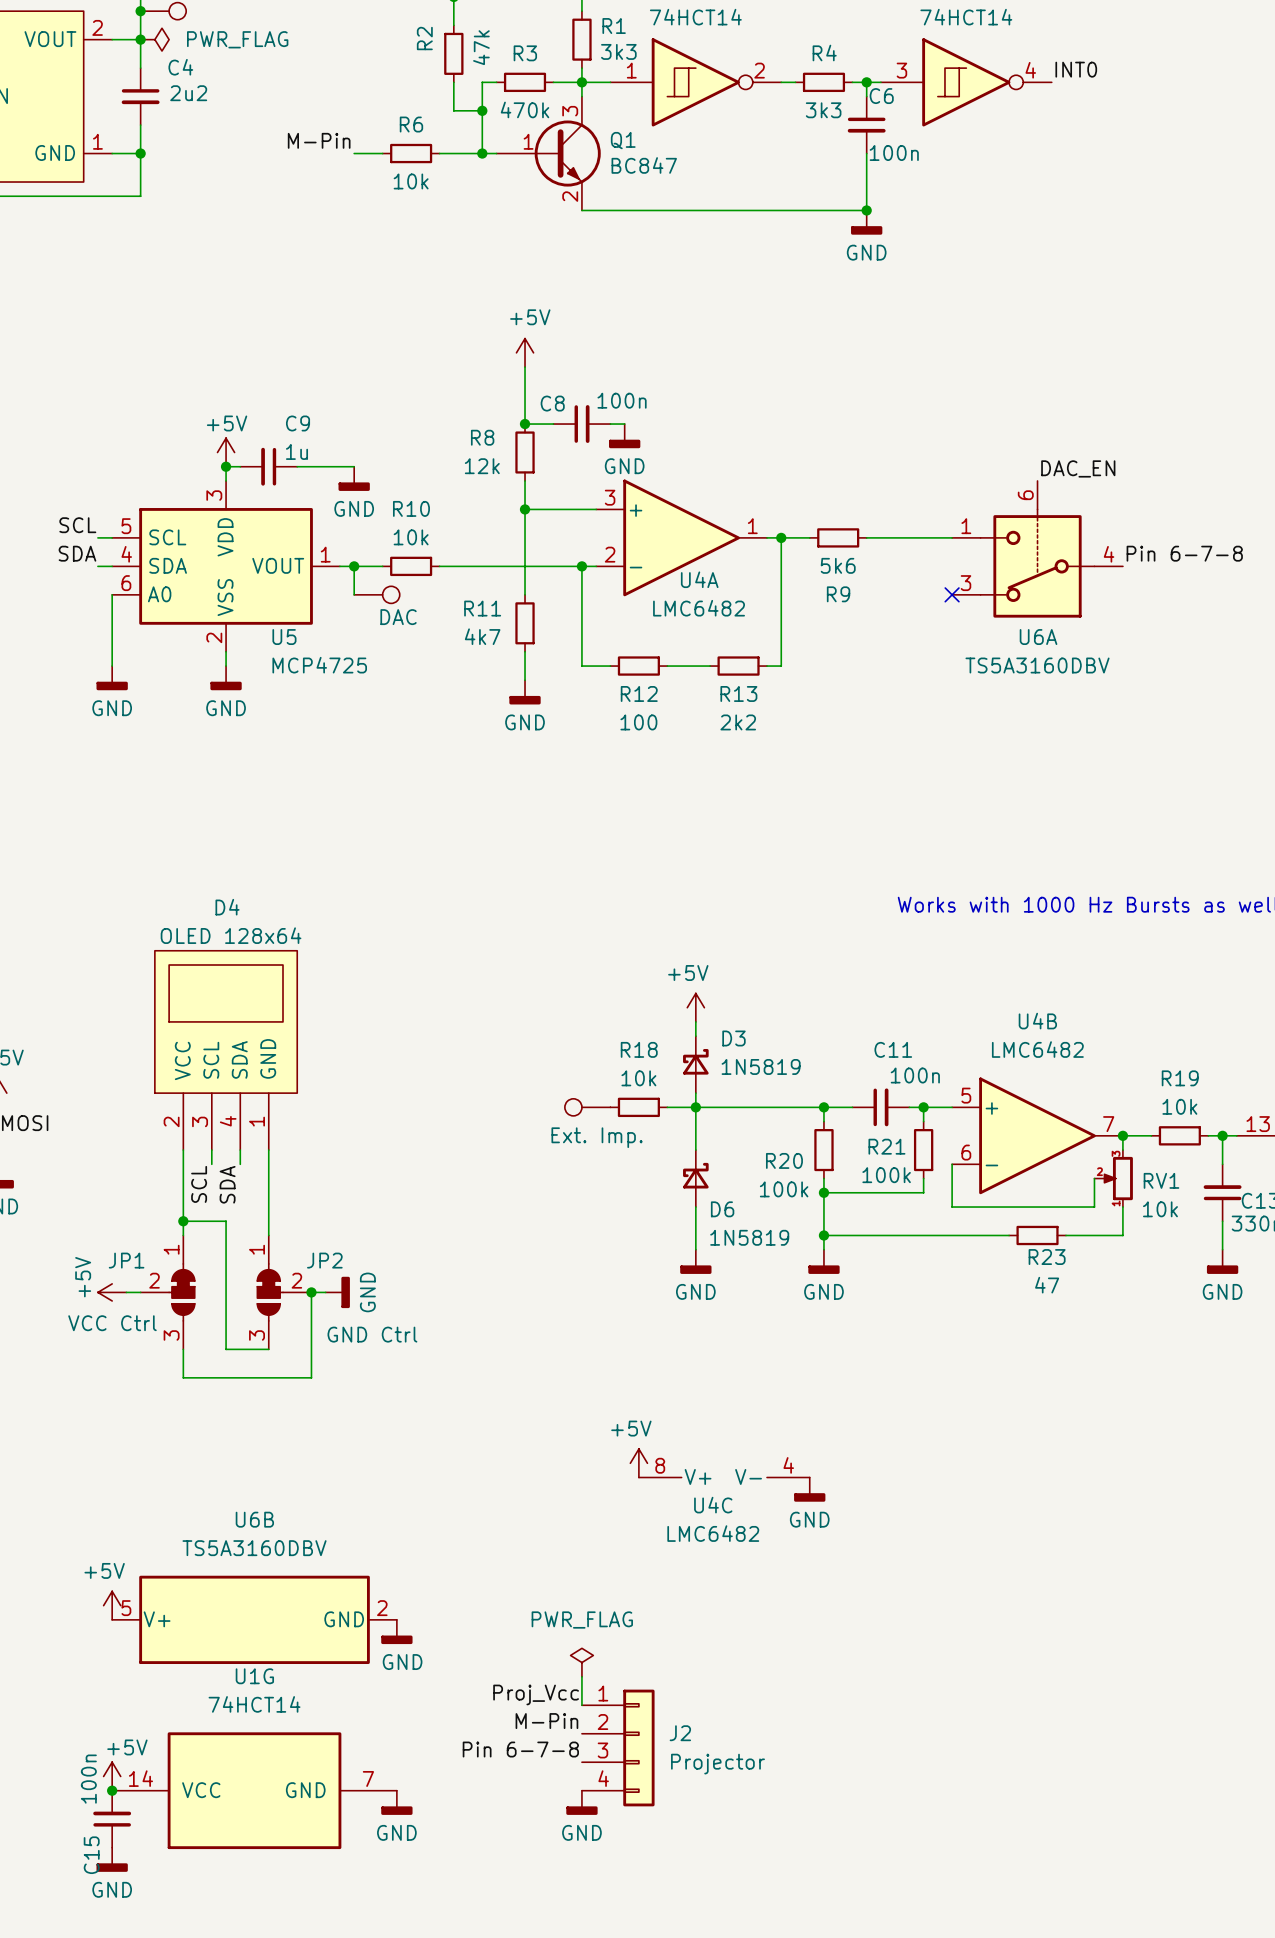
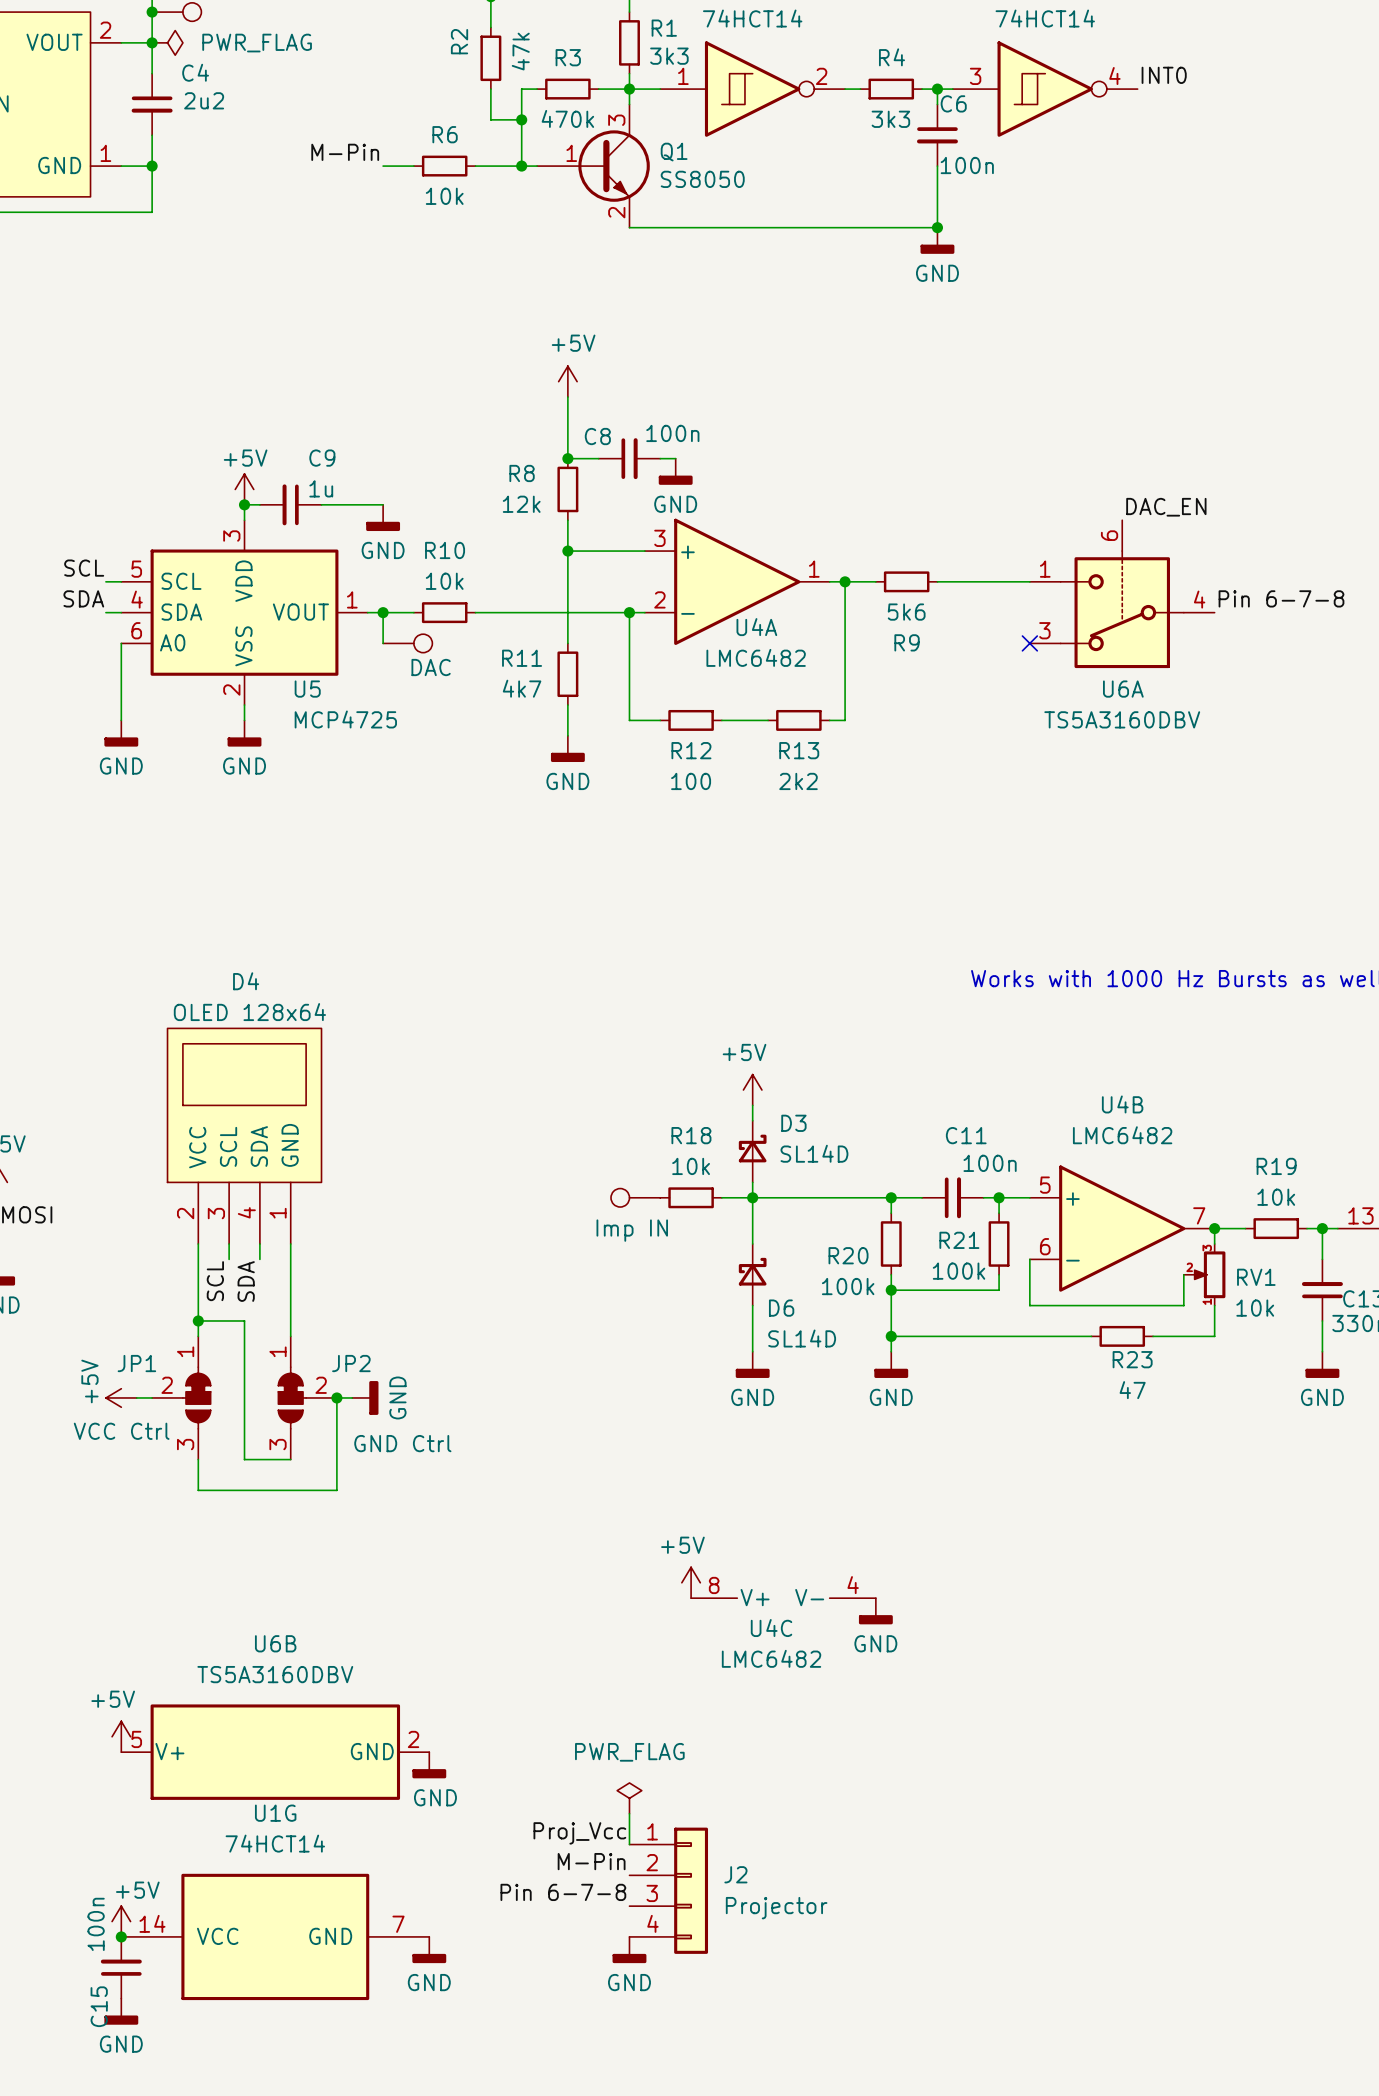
Q1 value: BC847 (644, 165) -> SS8050 (702, 179)
D3 value: 1N5819 (761, 1066) -> SL14D (814, 1153)
part value: Ext. Imp. (597, 1137) -> Imp IN (632, 1230)
D6 value: 1N5819 (749, 1237) -> SL14D (802, 1338)

